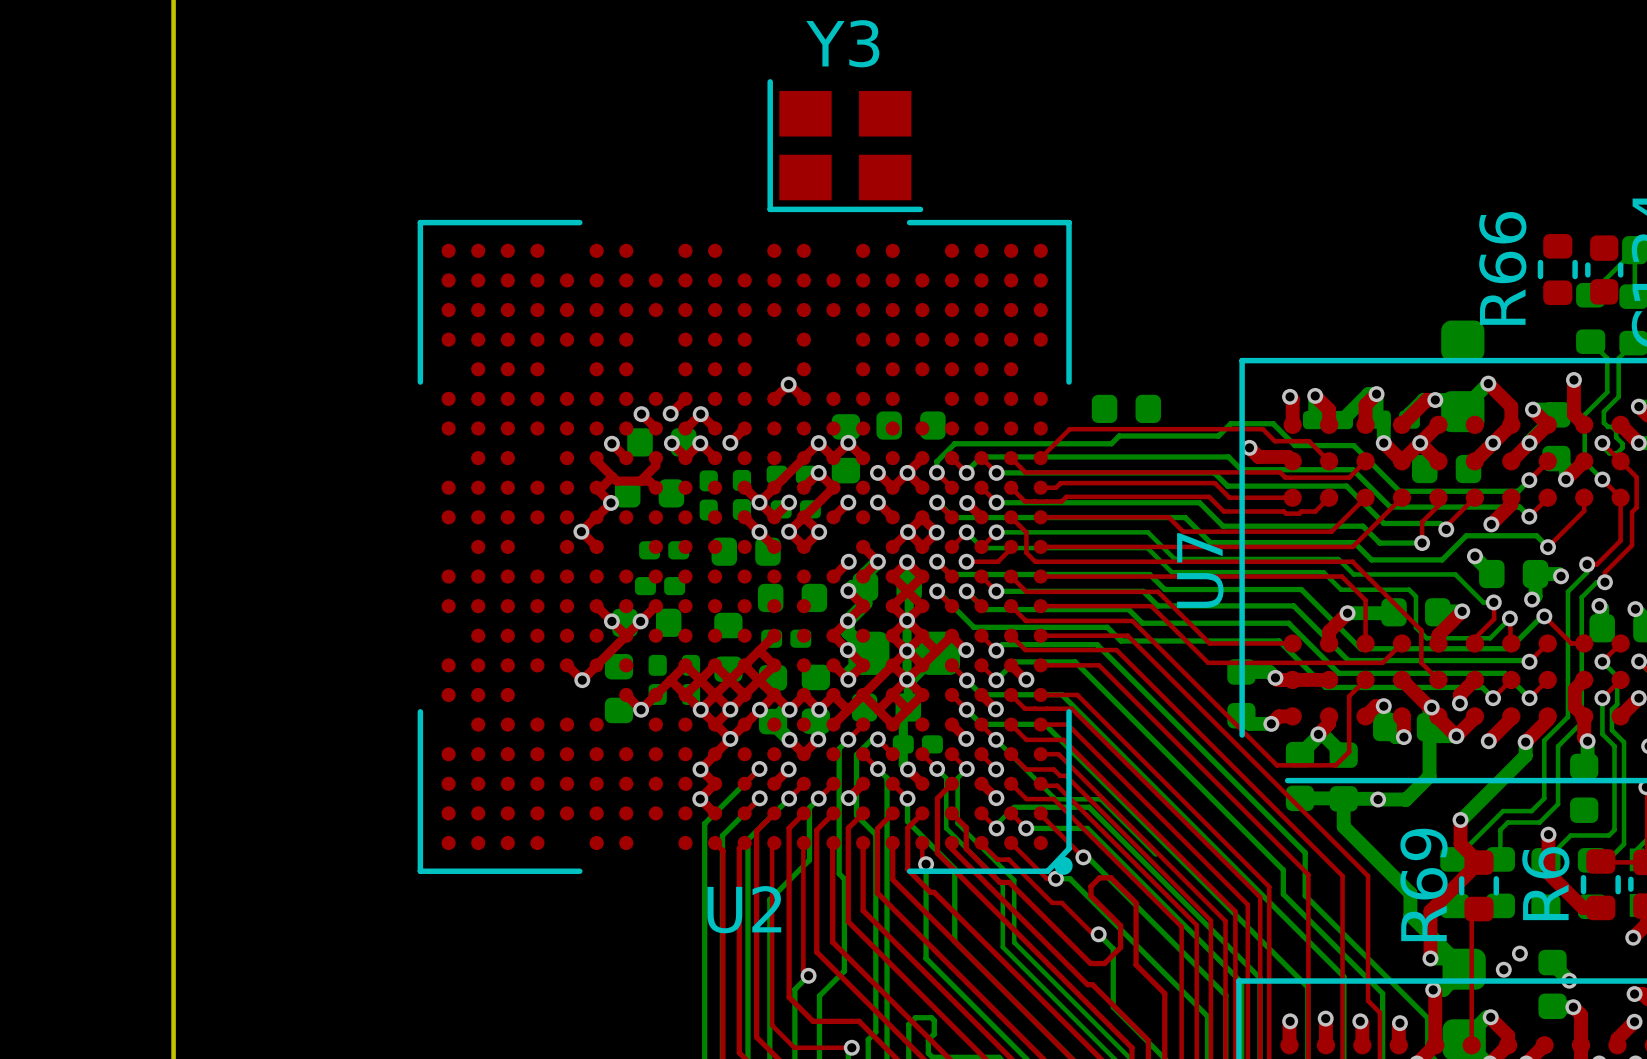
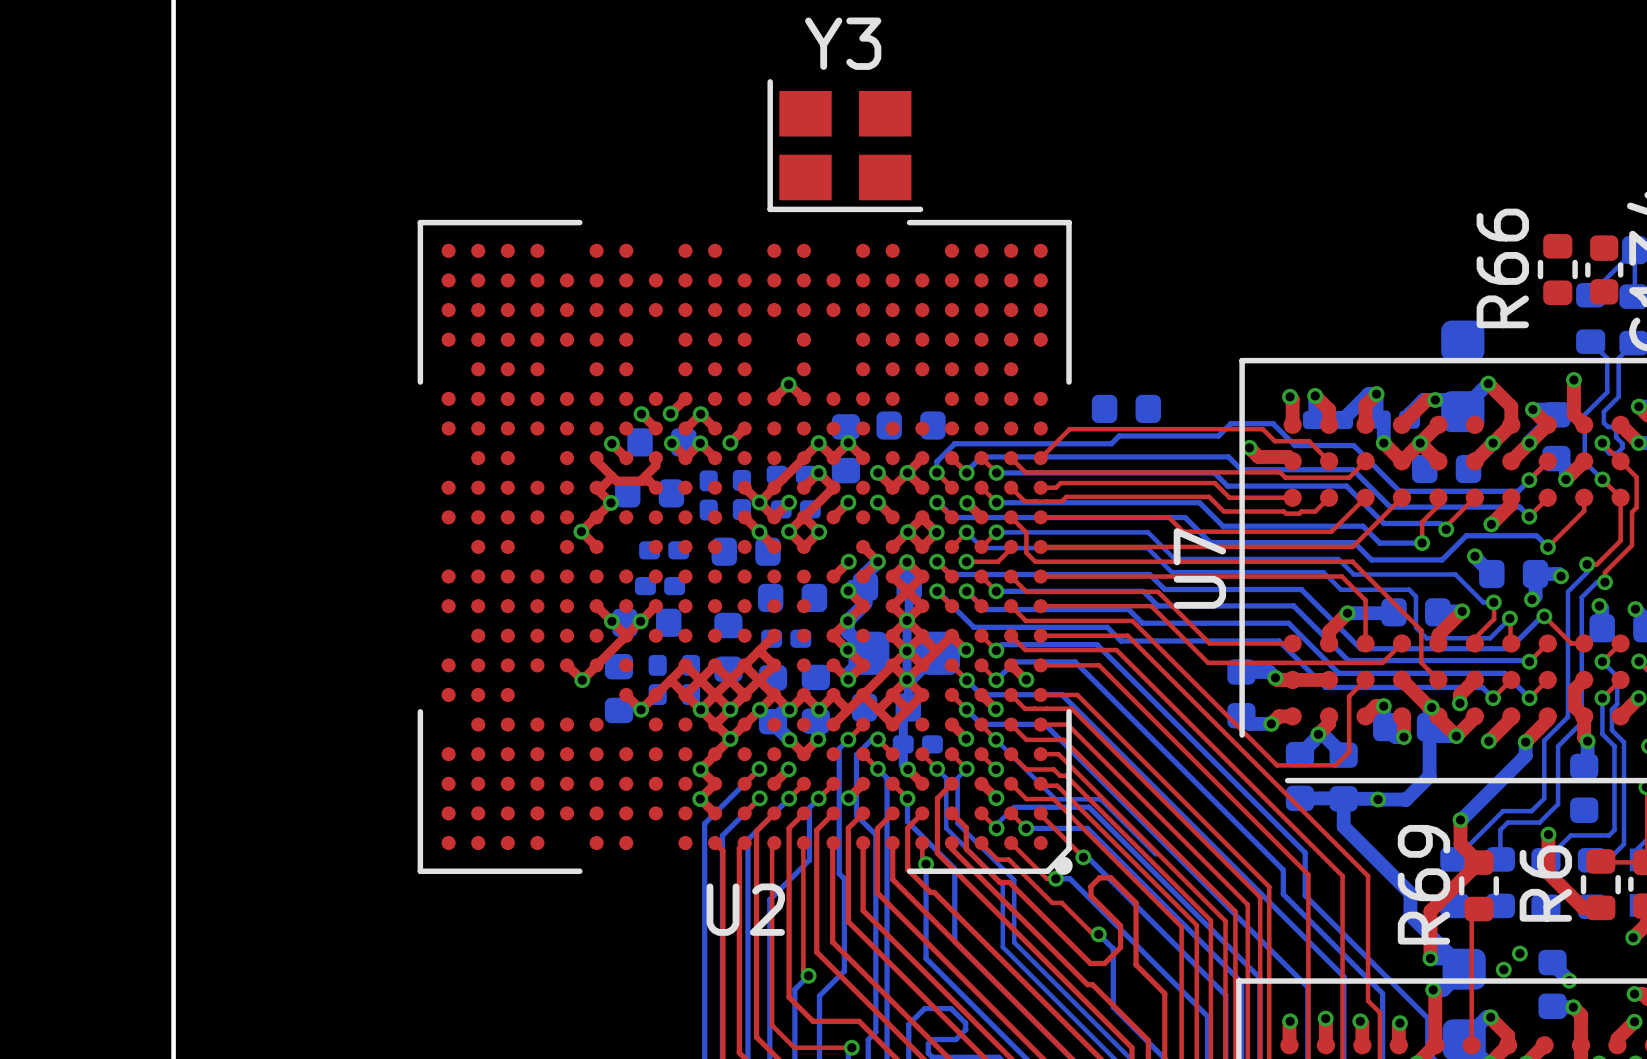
bottom track: (915, 1017) (931, 1017) (934, 1020) (934, 1034) (928, 1040) (928, 1043) -> (915, 1017) (924, 1008) (951, 1008) (965, 1023) (965, 1029) (955, 1039) (932, 1039) (928, 1043)

